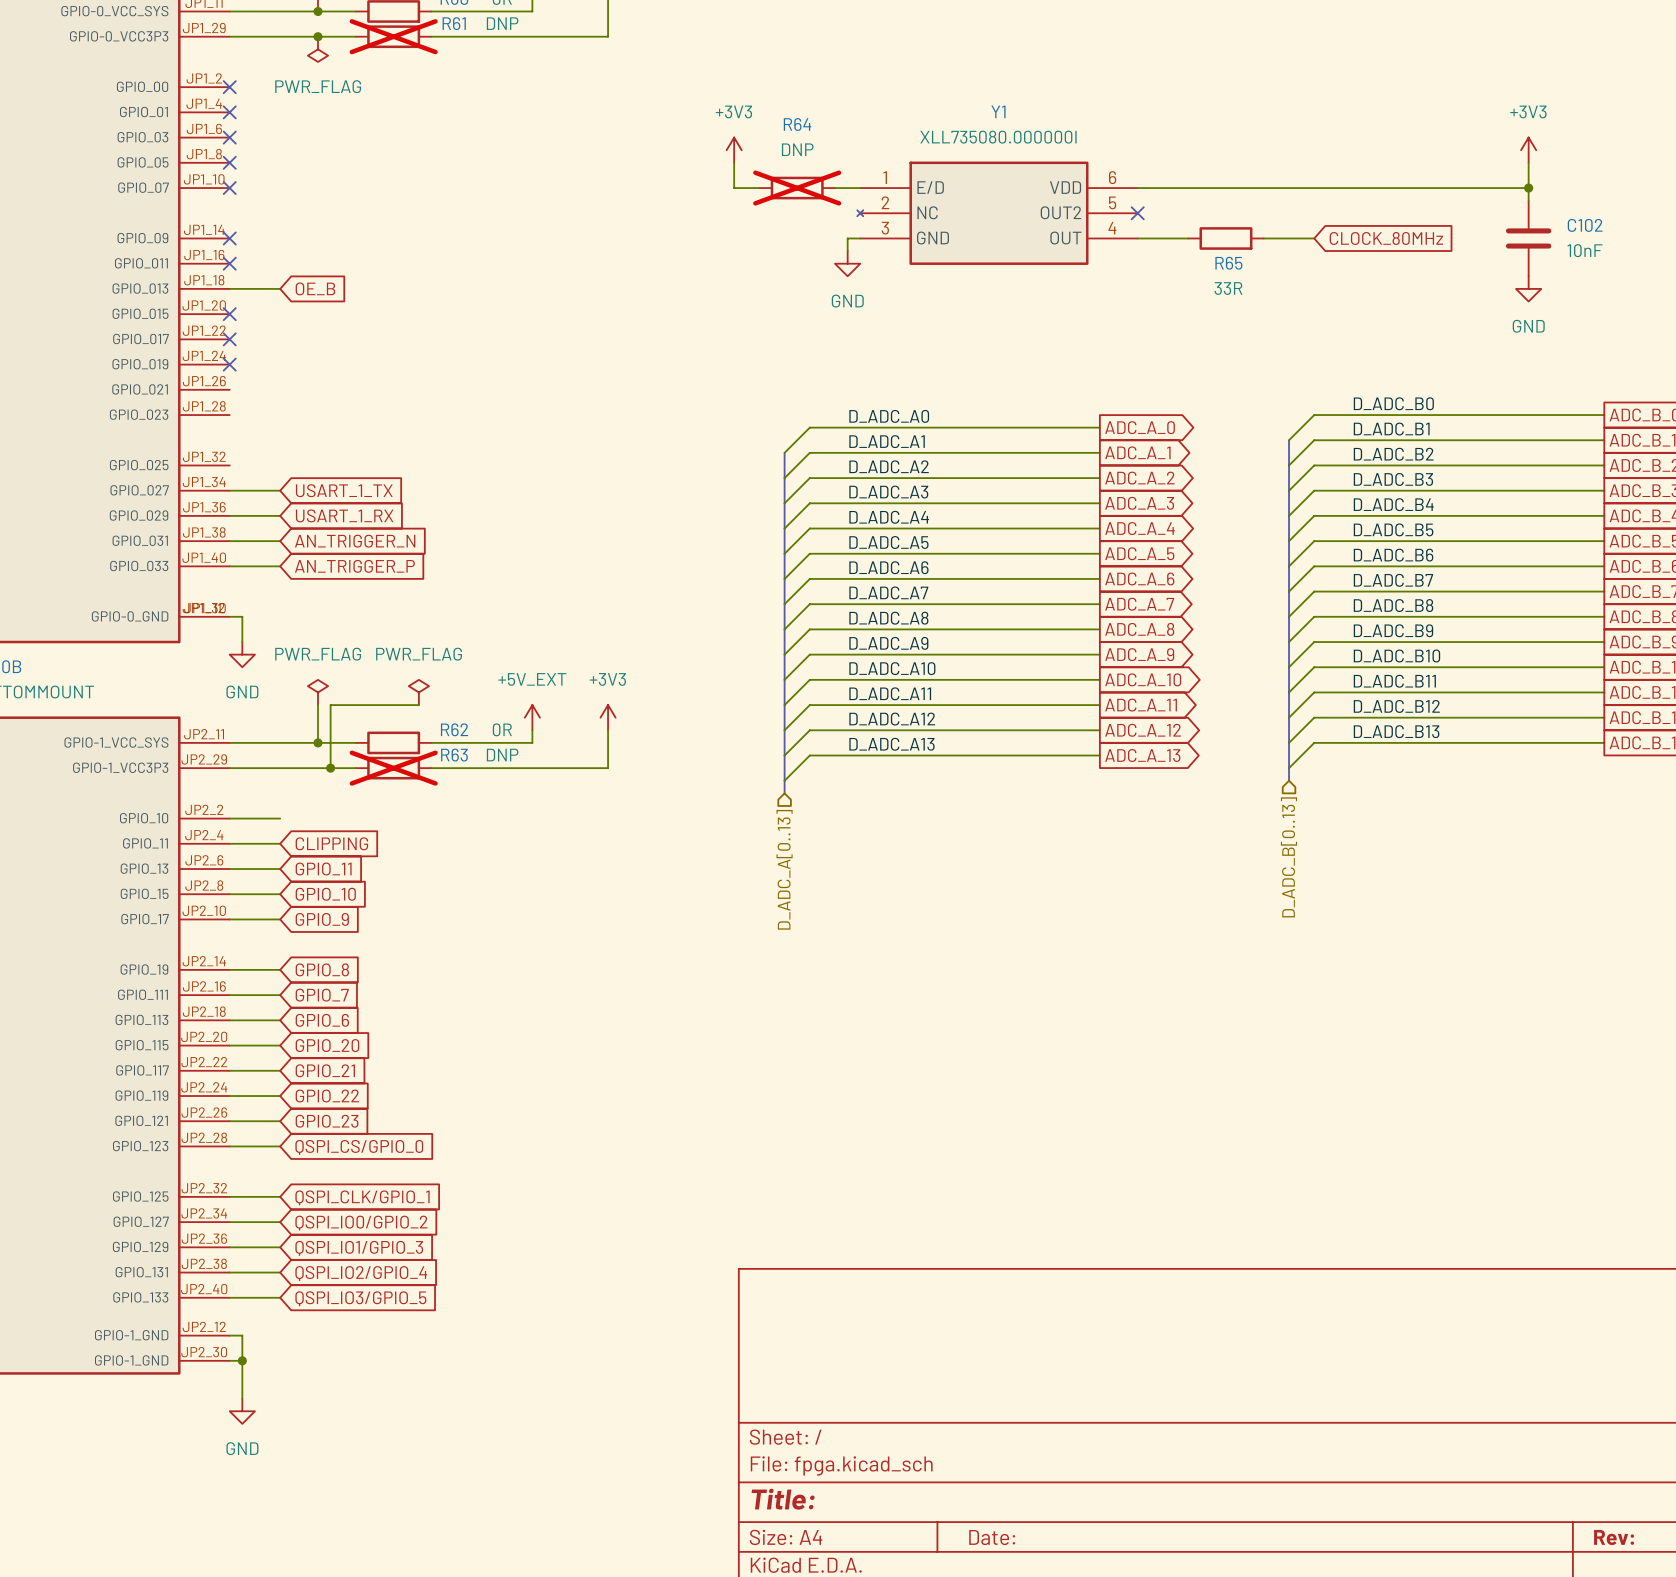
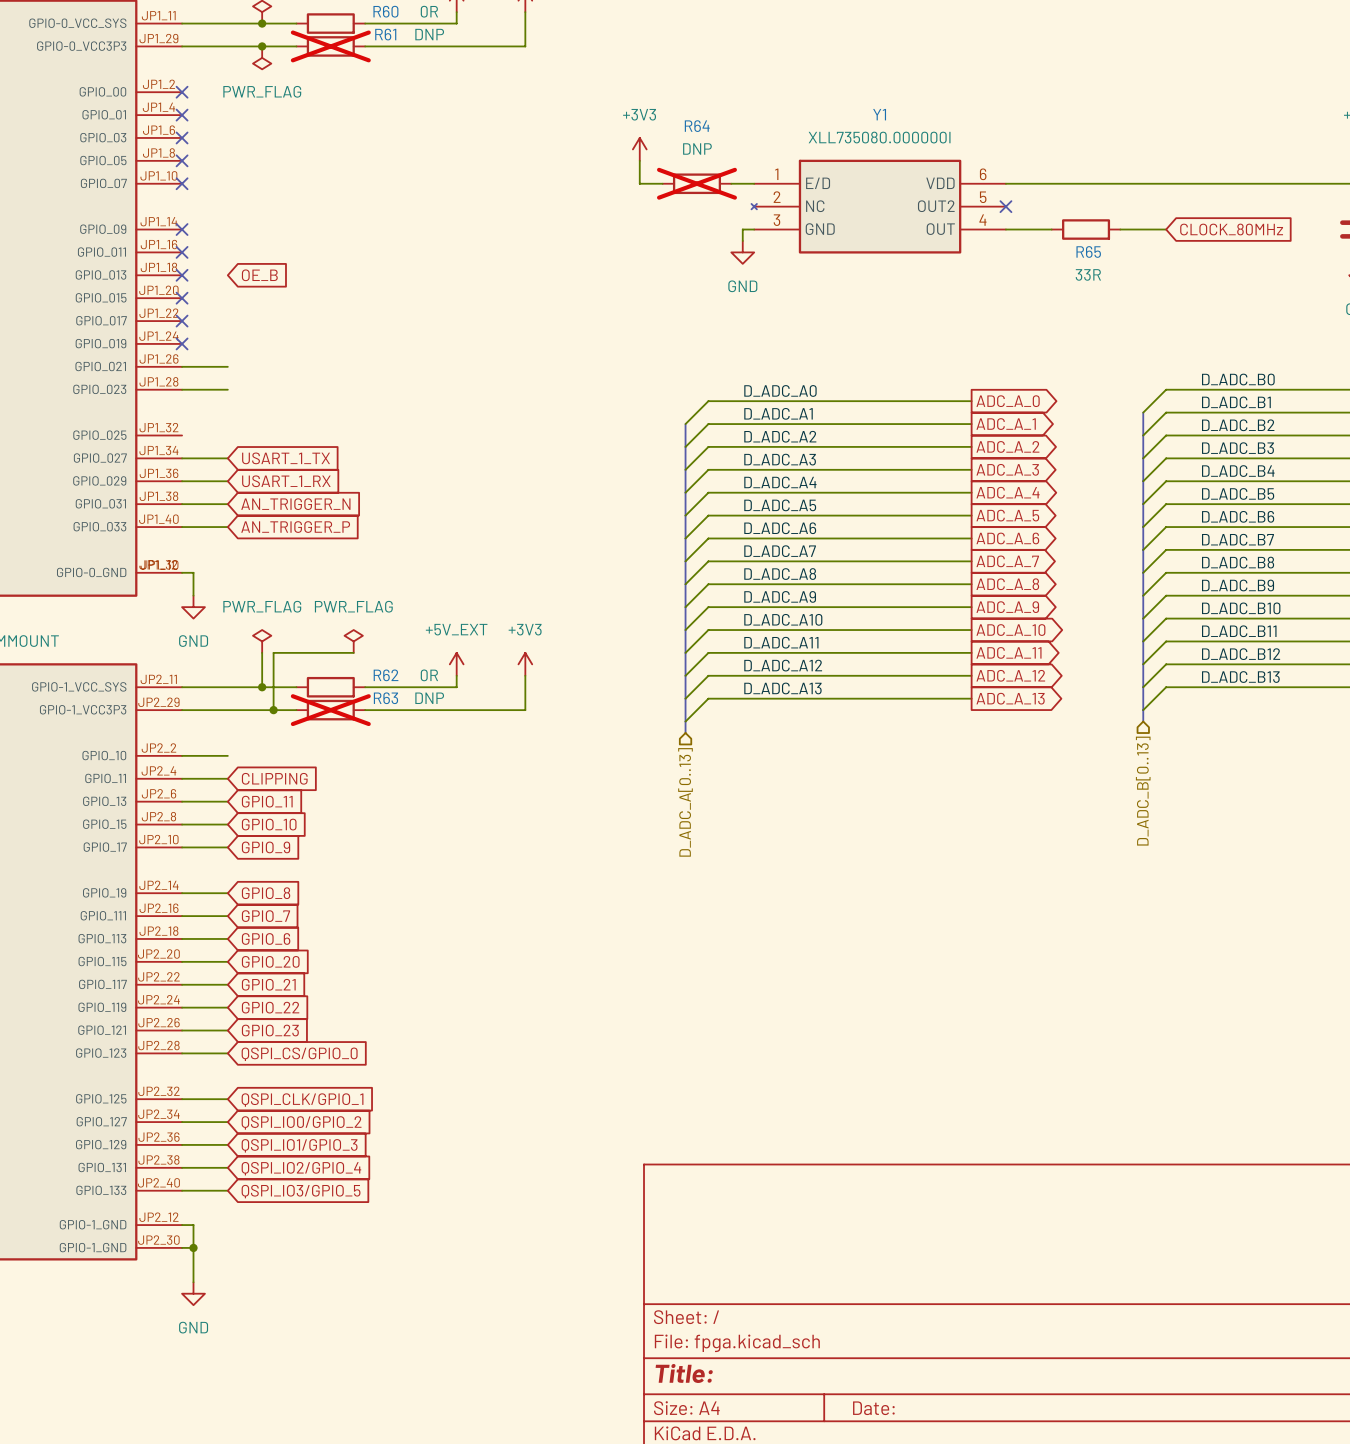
wire: (229, 288) (280, 288) -> (182, 366) (227, 366)
no-connect mark: none -> (182, 275)
wire: none -> (182, 389) (227, 389)

